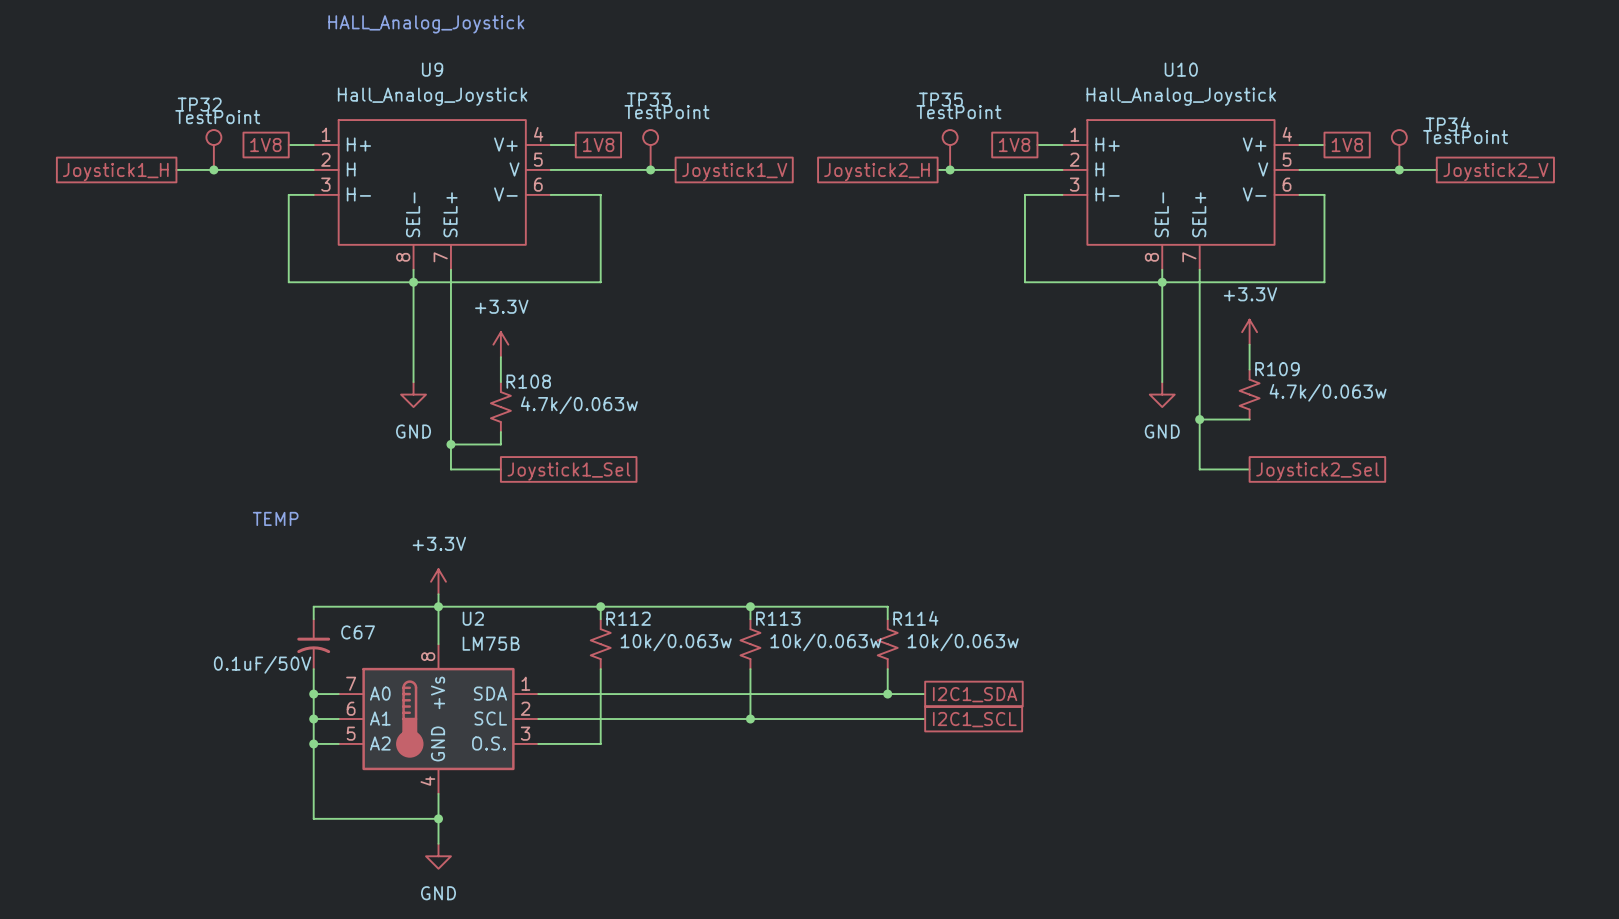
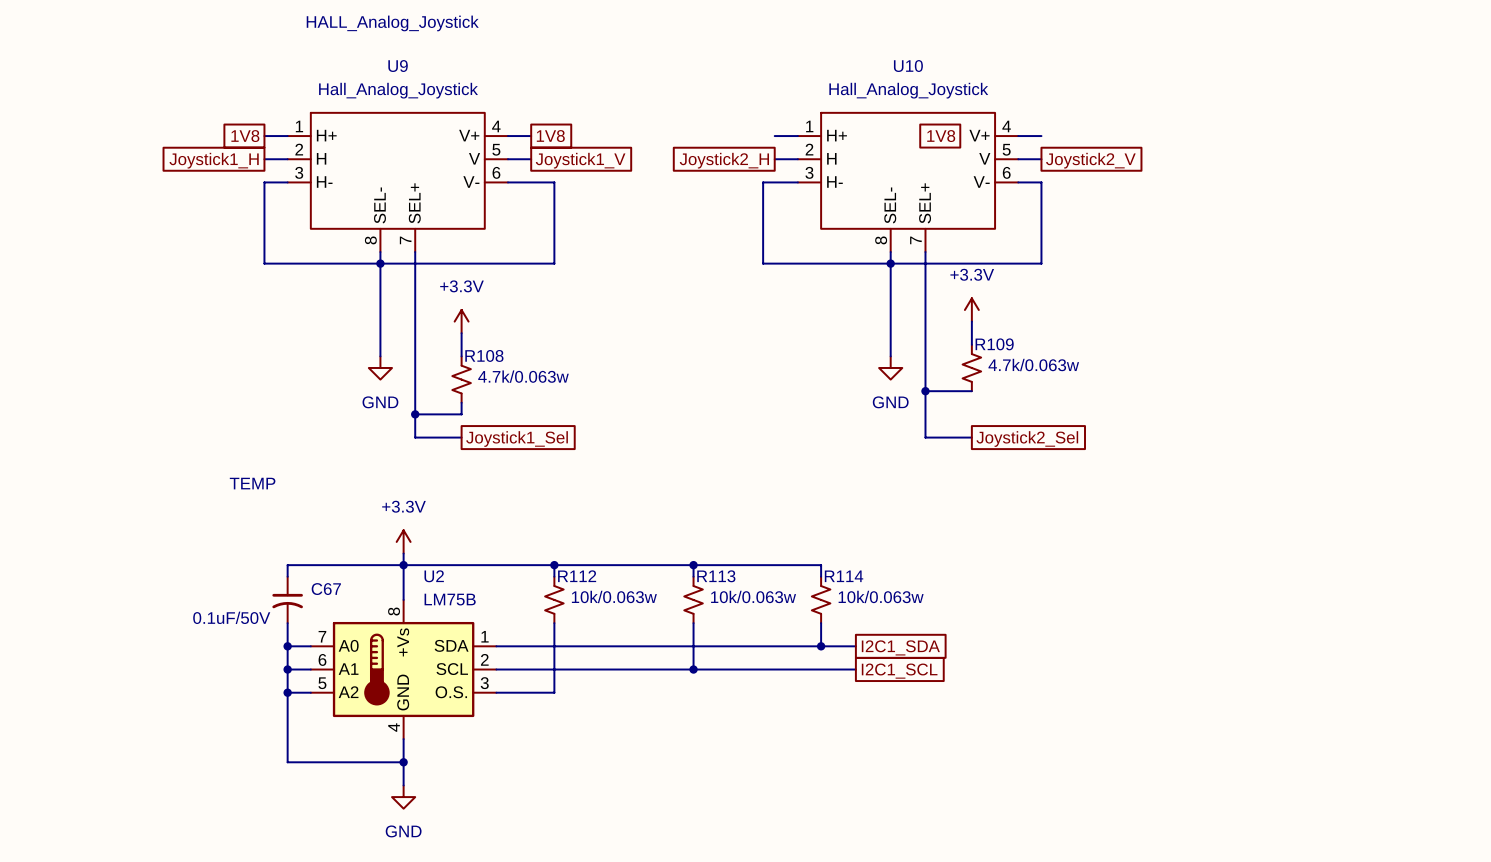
wire: (1037, 145) (1062, 145) -> (774, 136) (797, 136)
wire: (1299, 145) (1324, 145) -> (1018, 136) (1041, 136)
global label: 1V8 (1347, 145) -> none
TP32: TestPoint (213, 149) -> none
TP33: TestPoint (650, 149) -> none
TP35: TestPoint (950, 149) -> none
TP34: TestPoint (1399, 149) -> none
wire: (176, 169) (288, 169) -> none
junction: (213, 169) -> none
wire: (575, 169) (675, 169) -> none
junction: (650, 169) -> none
wire: none -> (774, 159) (797, 159)
wire: (937, 169) (1062, 169) -> none
junction: (950, 169) -> none
wire: none -> (1018, 159) (1041, 159)
wire: (1299, 169) (1436, 169) -> none
junction: (1399, 169) -> none
global label position: Joystick1_H (115, 172) -> Joystick1_H (214, 160)
global label position: Joystick1_V (734, 172) -> Joystick1_V (580, 160)
global label position: Joystick2_H (877, 172) -> Joystick2_H (724, 160)
global label: none -> Joystick2_V (1090, 160)
global label: Joystick2_V (1495, 172) -> none
wire: (1062, 194) (1024, 194) (1024, 282) -> (797, 182) (763, 182) (763, 263) (948, 263)
U10 position: (1180, 194) -> (908, 182)
wire: (1299, 194) (1324, 194) (1324, 282) (1124, 282) -> (1018, 182) (1041, 182) (1041, 263)
wire: (1162, 269) (1162, 382) -> (890, 252) (890, 356)
wire: (1199, 269) (1199, 469) (1249, 469) -> (925, 252) (925, 437) (971, 437)
junction: none -> (890, 263)
junction: (1162, 282) -> none
power symbol position: +3.3V (1249, 332) -> +3.3V (971, 310)
wire: (1249, 344) (1249, 369) -> (971, 321) (971, 344)
power symbol position: GND (1162, 394) -> GND (890, 367)
R109 position: (1249, 394) -> (971, 367)
junction: none -> (925, 391)
wire: (1199, 419) (1249, 419) -> (925, 391) (971, 391)
junction: (1199, 419) -> none
global label position: Joystick2_Sel (1317, 471) -> Joystick2_Sel (1027, 439)

